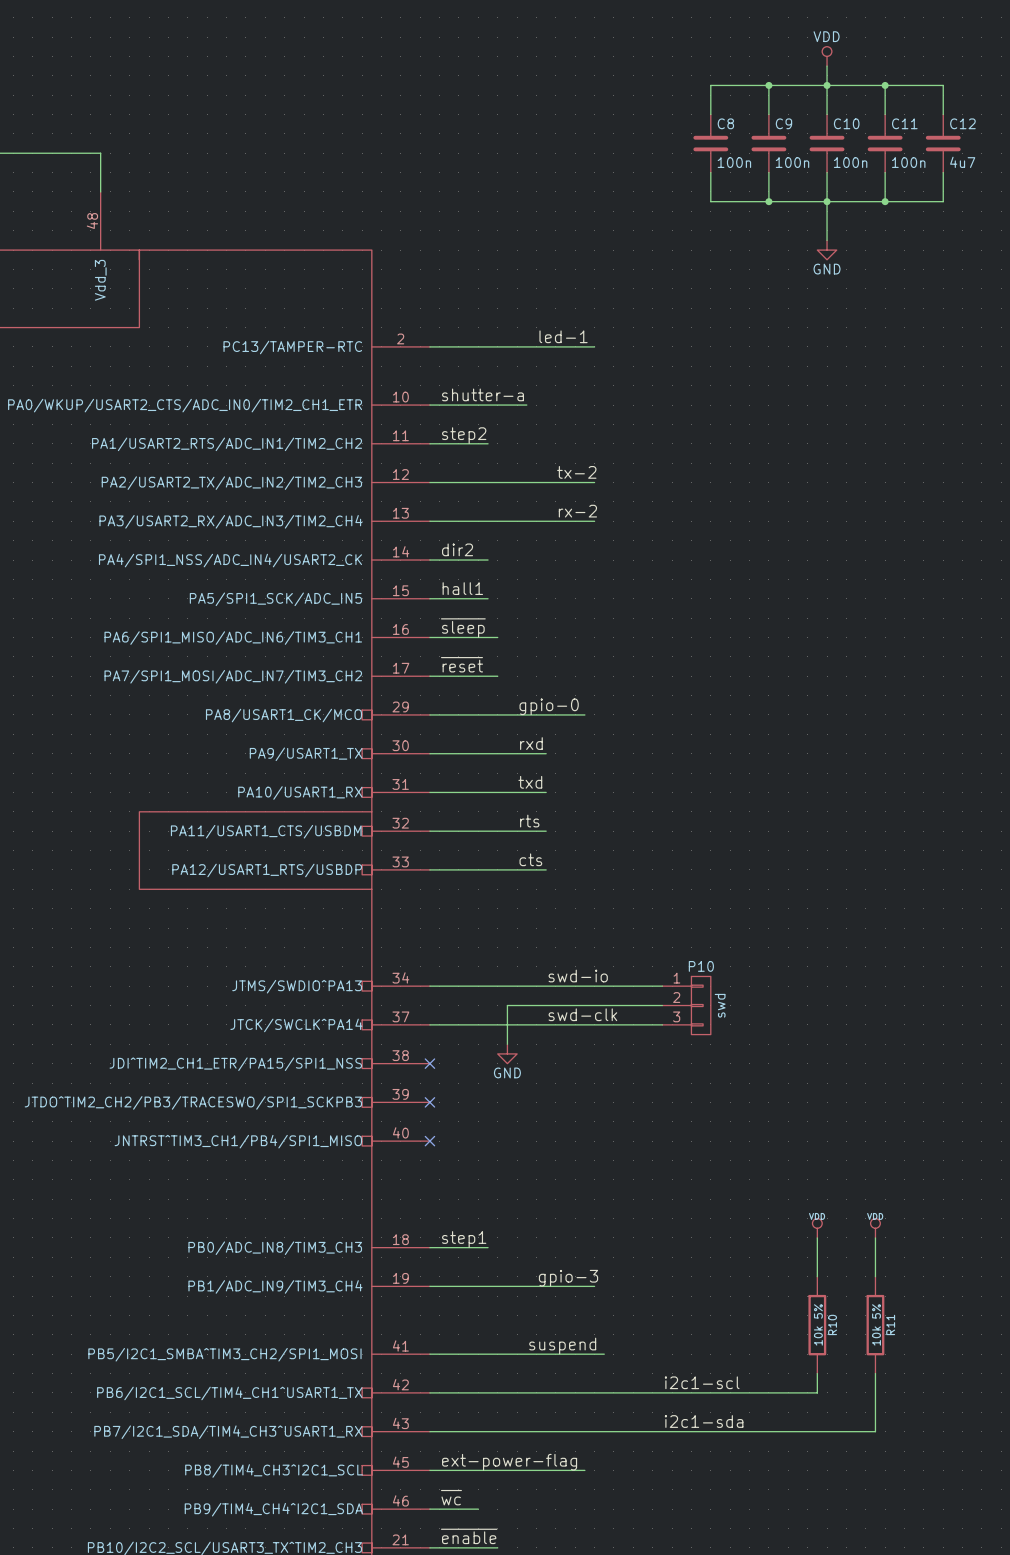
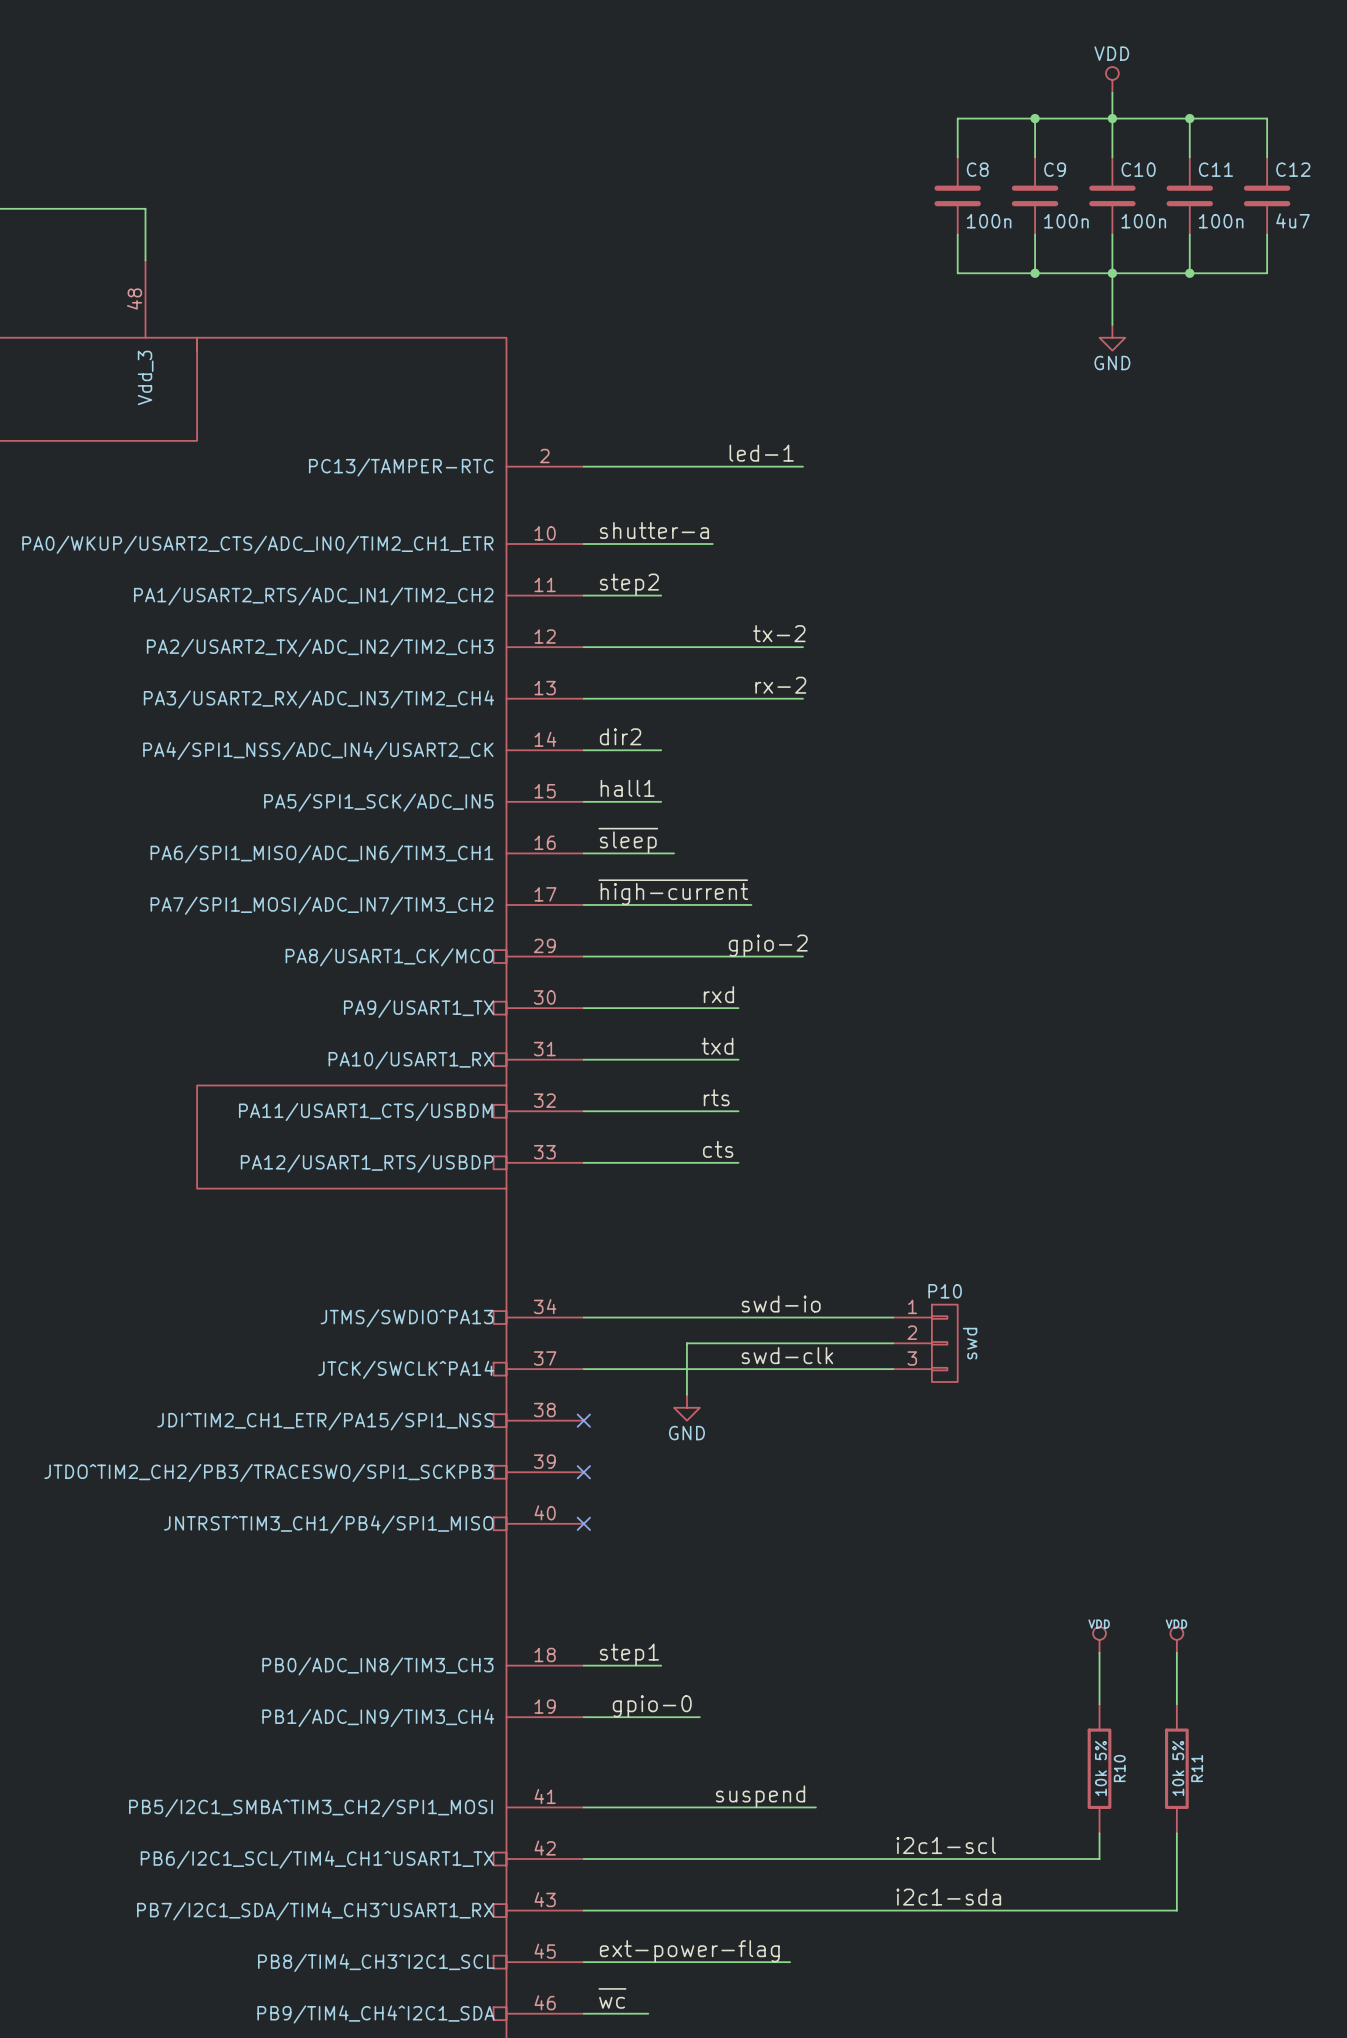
label: ~{reset} (462, 664) -> ~{high-current} (673, 892)
wire: none -> (674, 904) (751, 904)
label: gpio-0 (549, 706) -> gpio-2 (768, 945)
wire: none -> (790, 956) (803, 956)
label: none -> gpio-0 (652, 1706)
label: gpio-3 (568, 1278) -> none
wire: (517, 1286) (594, 1286) -> none

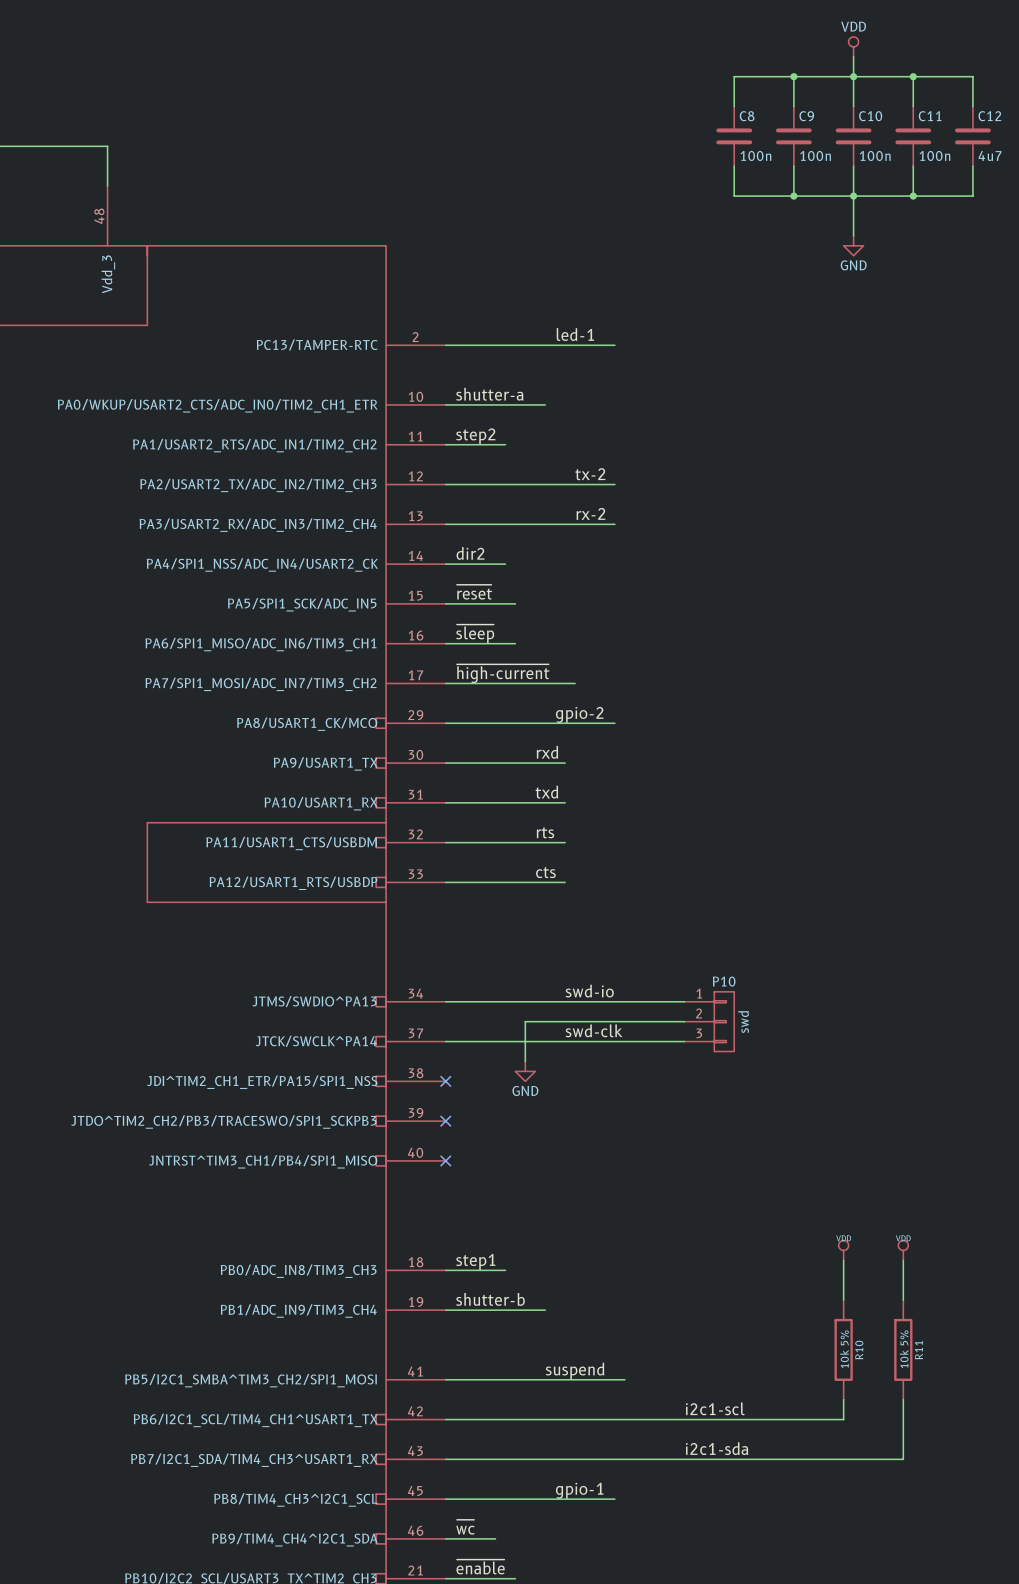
label: hall1 (627, 788) -> ~{reset} (474, 592)
wire: none -> (505, 603) (515, 603)
label: none -> shutter-b (490, 1299)
label: gpio-0 (652, 1706) -> none
wire: none -> (535, 1310) (545, 1310)
label: ext-power-flag (689, 1951) -> none
label: none -> gpio-1 (579, 1490)
wire: none -> (604, 1499) (614, 1499)

